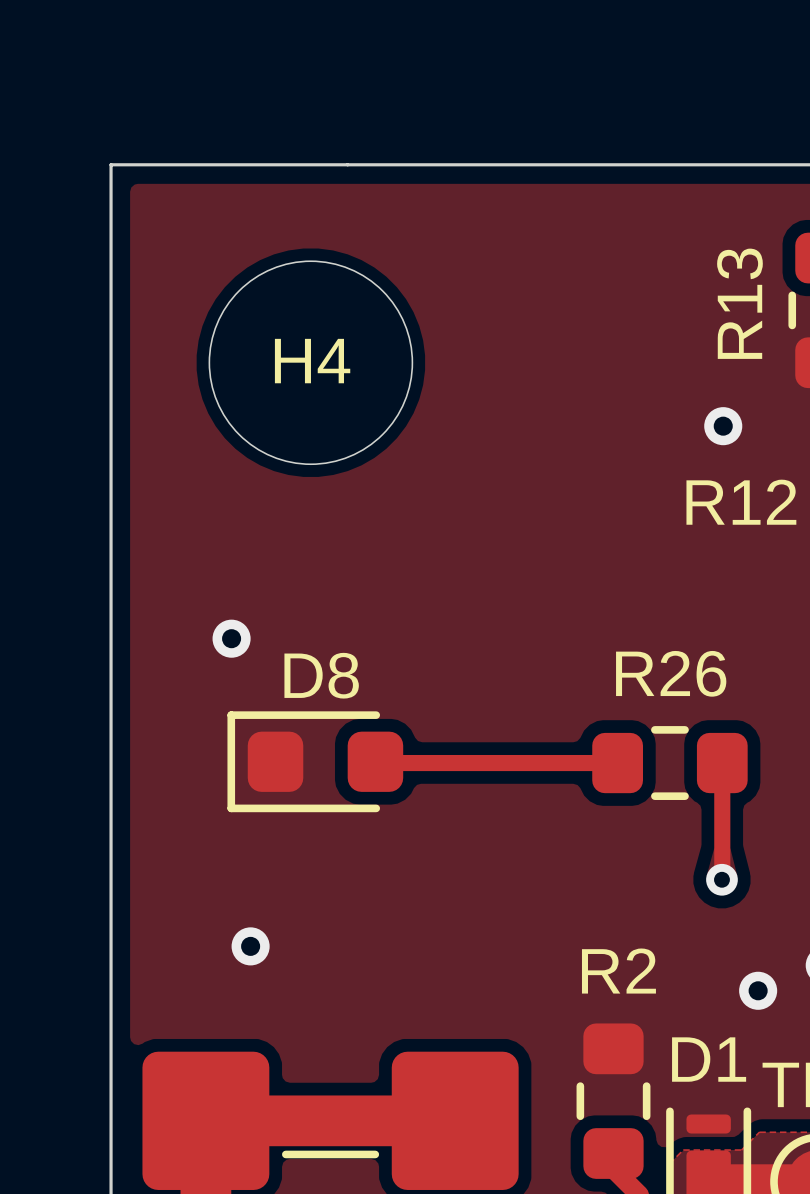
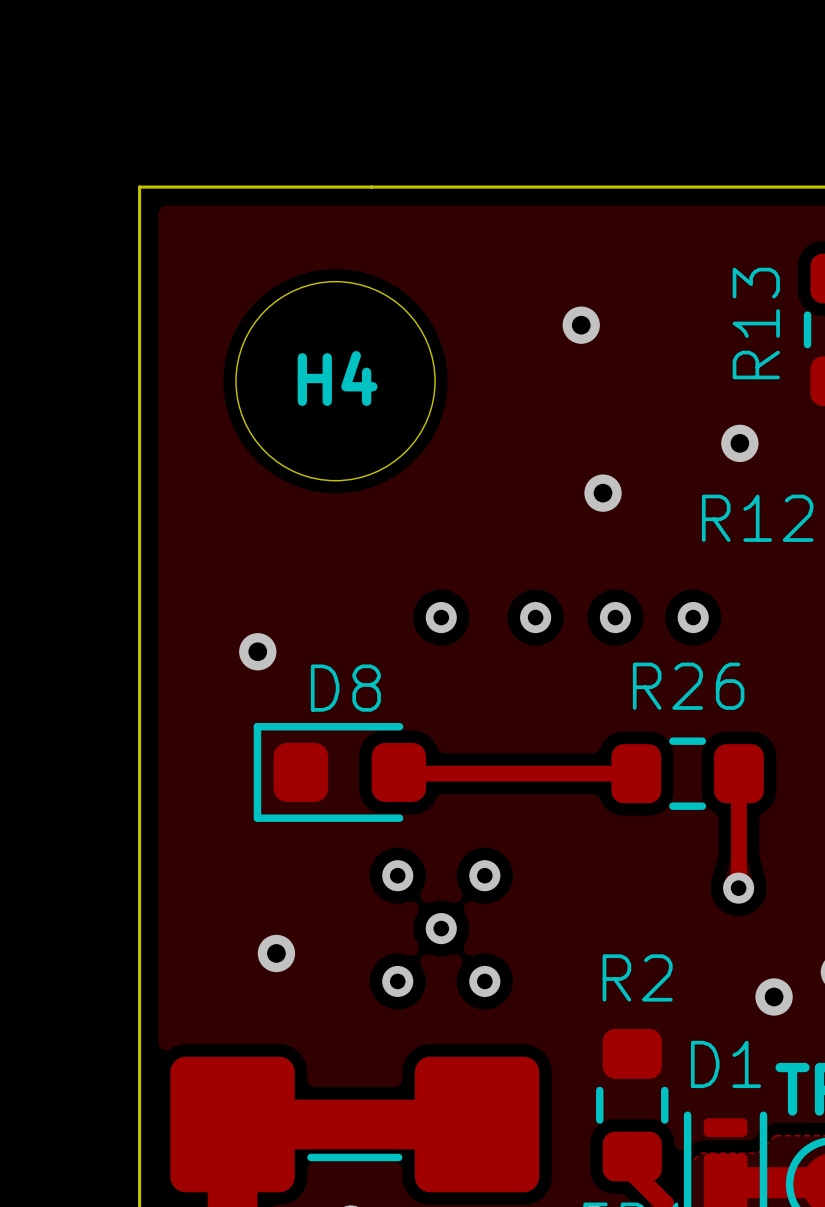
via: none -> (581, 325)
via: none -> (603, 493)
via: none -> (441, 617)
via: none -> (535, 617)
via: none -> (615, 617)
via: none -> (693, 617)
via: none -> (397, 875)
via: none -> (484, 875)
via: none -> (441, 928)
via: none -> (397, 981)
via: none -> (484, 981)

